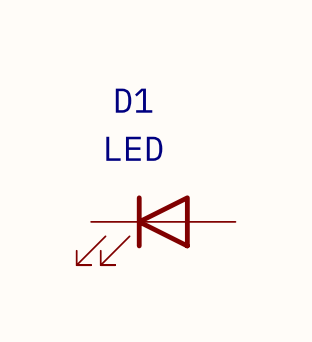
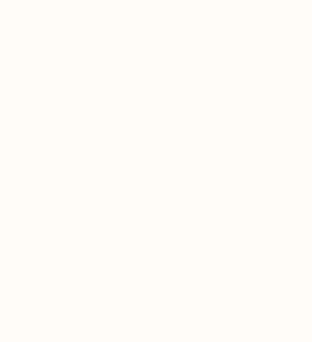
D1: LED (156, 230) -> none

